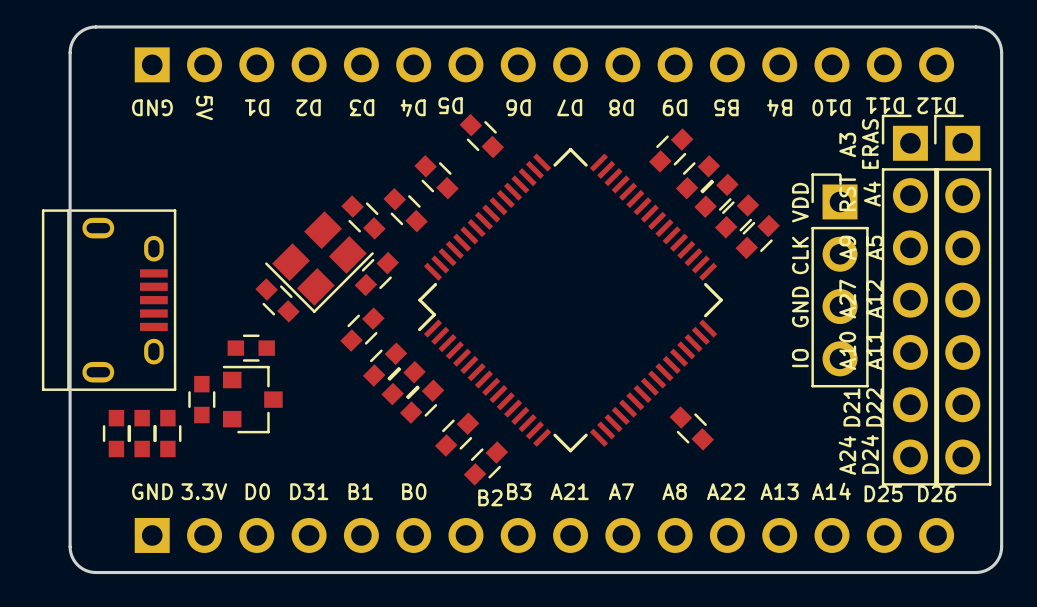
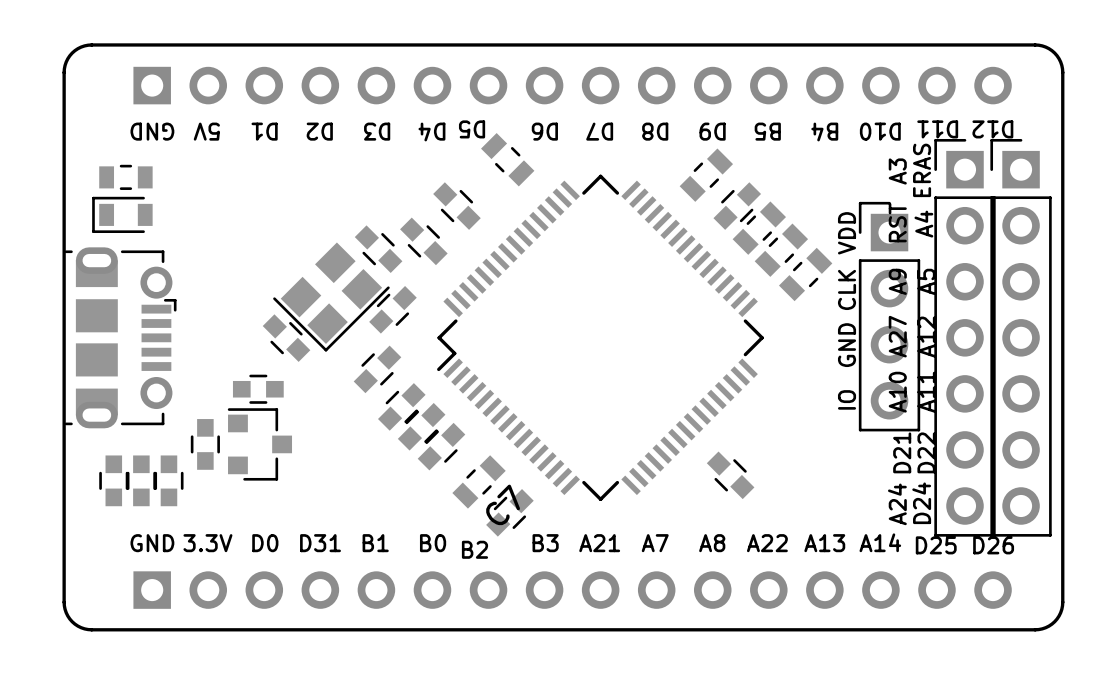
text rotation: 0° (204, 107) -> 90° clockwise (206, 131)
part footprint: [459, 113, 505, 159] -> [481, 133, 535, 187]
part footprint: [649, 128, 694, 173] -> [679, 148, 734, 202]
part: none -> (125, 177)
part footprint: [694, 173, 739, 218] -> [732, 201, 787, 255]
part: none -> (122, 214)
part footprint: [714, 194, 760, 239] -> [754, 223, 809, 277]
part footprint: [41, 209, 177, 391] -> [64, 247, 177, 429]
part footprint: [735, 214, 780, 260] -> [778, 247, 833, 302]
part: (457, 434) -> none
C7: none -> (479, 481)
text position: B2 (490, 497) -> B2 (474, 549)

